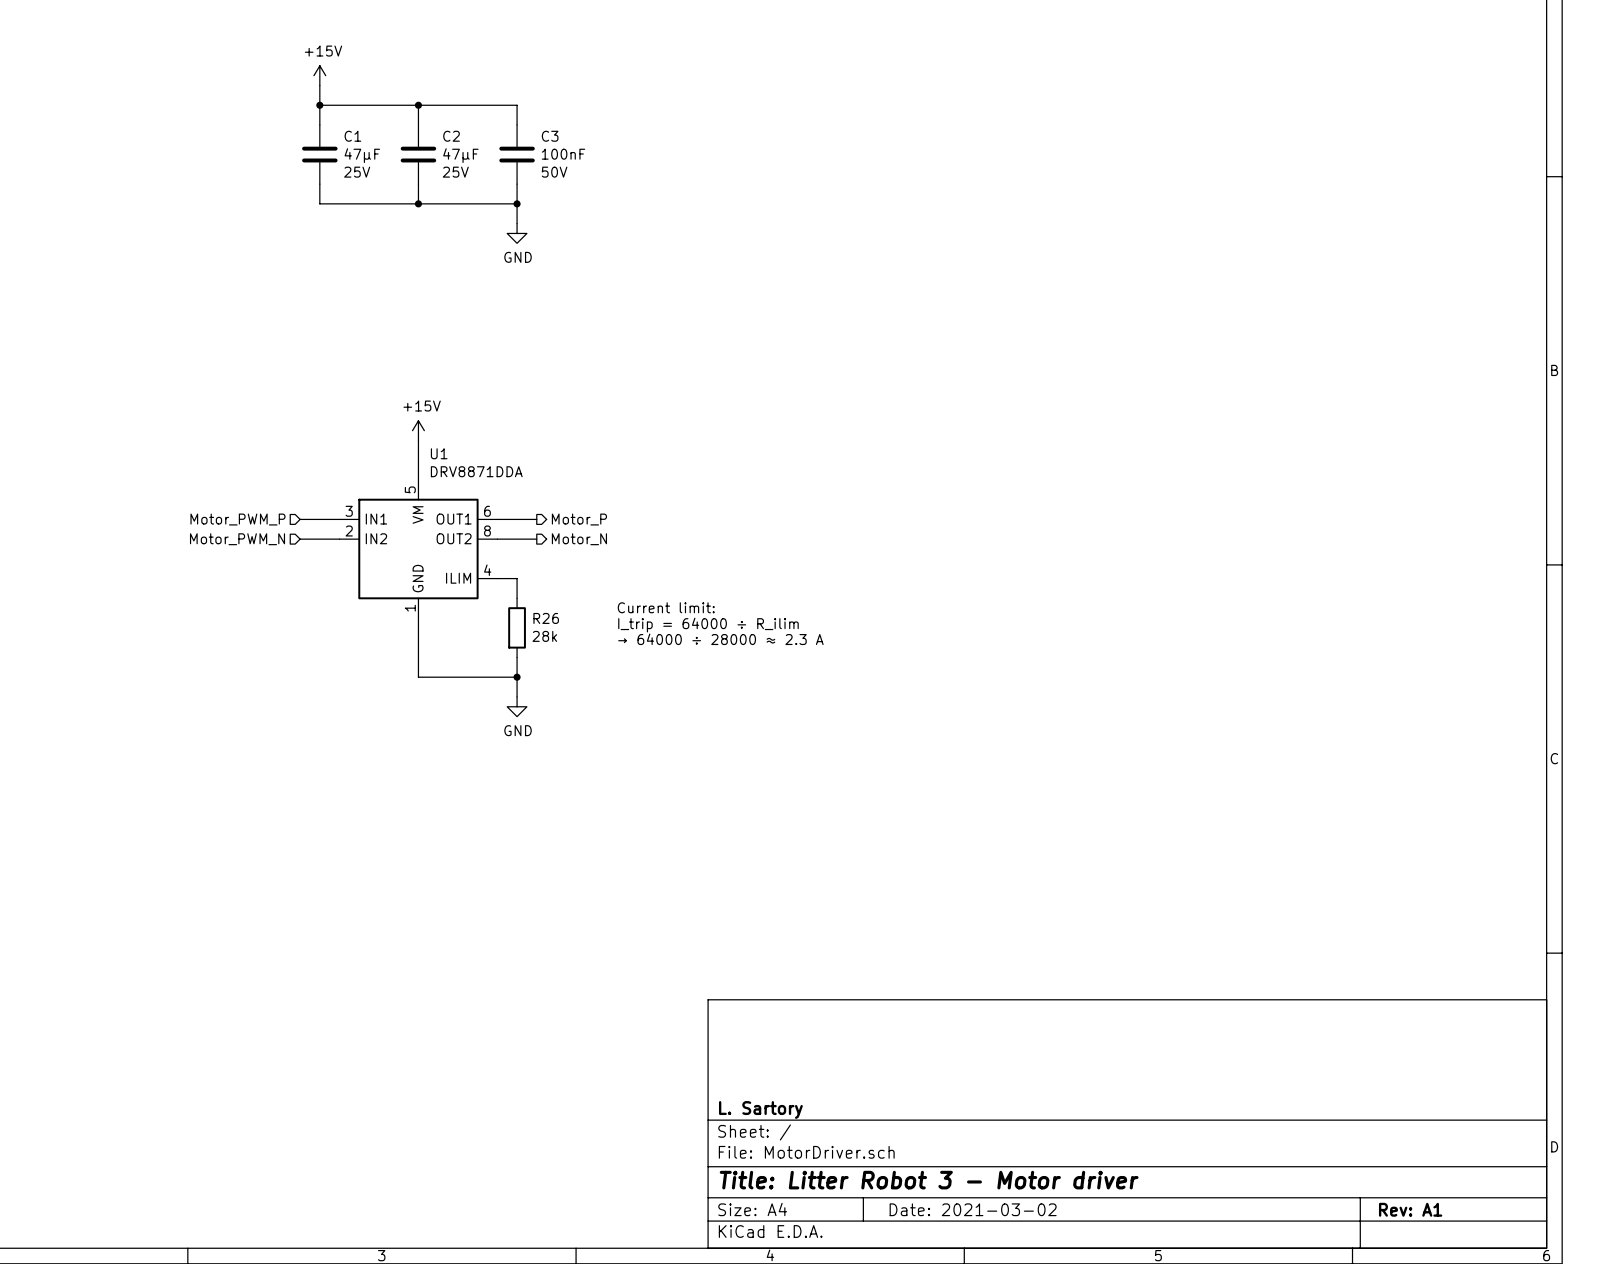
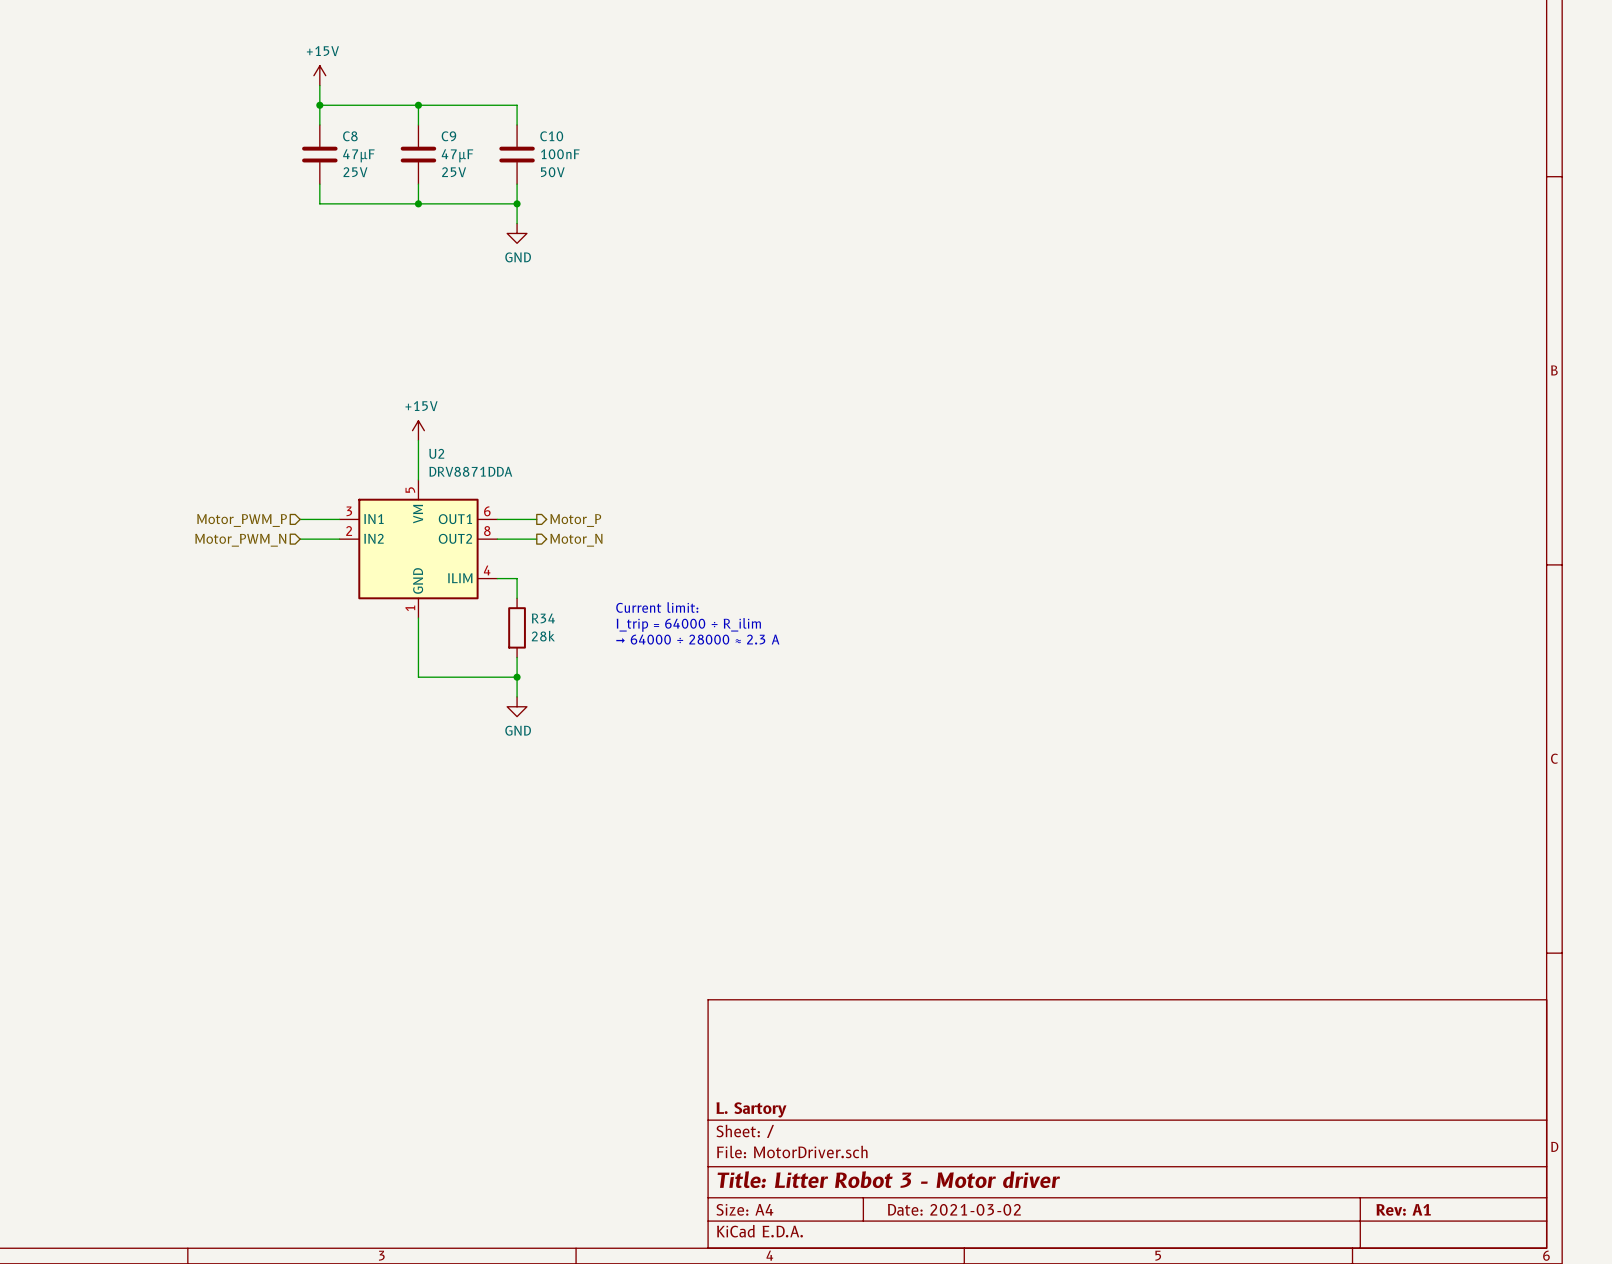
C1 name: C1 (352, 136) -> C8 (350, 136)
C2 name: C2 (451, 136) -> C9 (448, 136)
C3 name: C3 (550, 136) -> C10 (551, 136)
U1 name: U1 (439, 453) -> U2 (436, 453)
R26 name: R26 (546, 618) -> R34 (543, 618)

